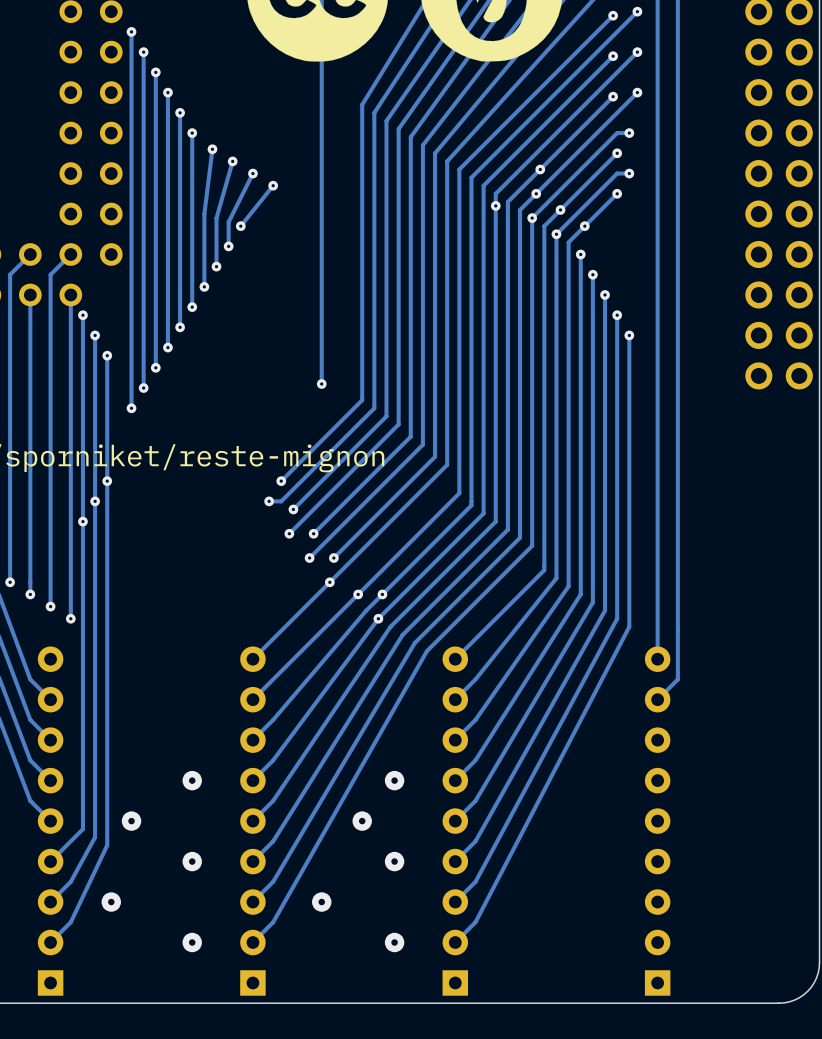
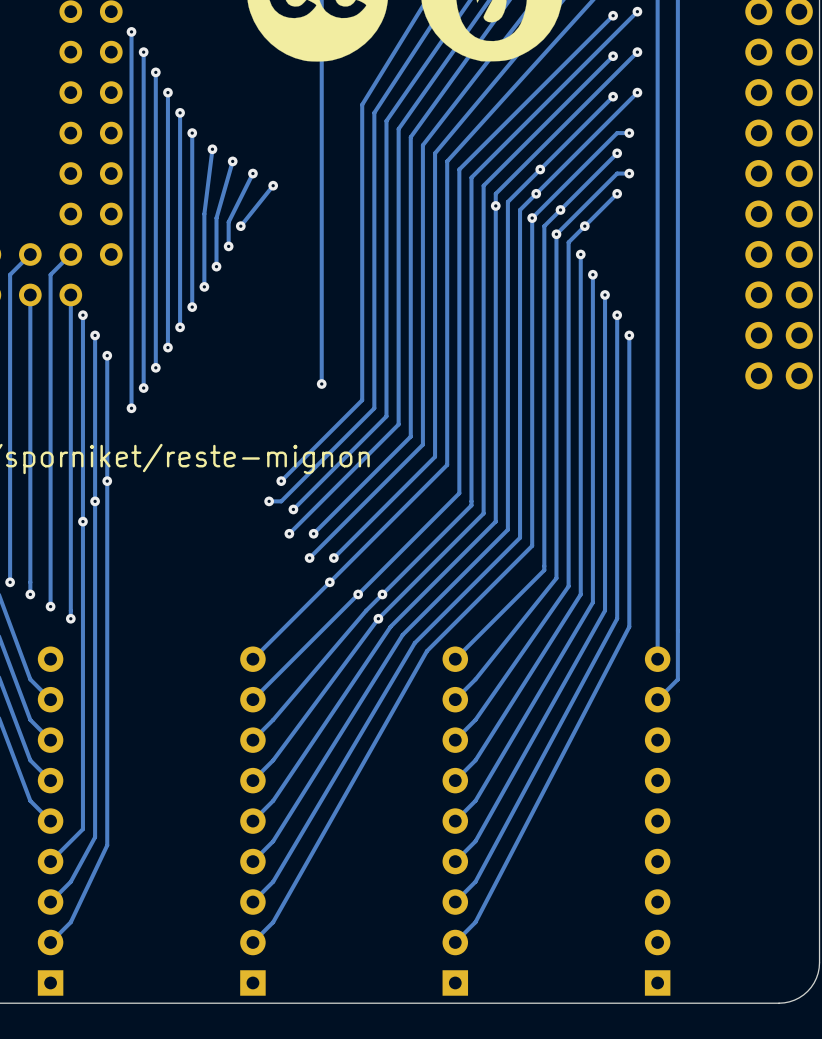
via: (192, 780) -> none
via: (394, 780) -> none
via: (131, 821) -> none
via: (362, 821) -> none
via: (192, 861) -> none
via: (394, 861) -> none
via: (111, 902) -> none
via: (321, 902) -> none
via: (192, 942) -> none
via: (394, 942) -> none

